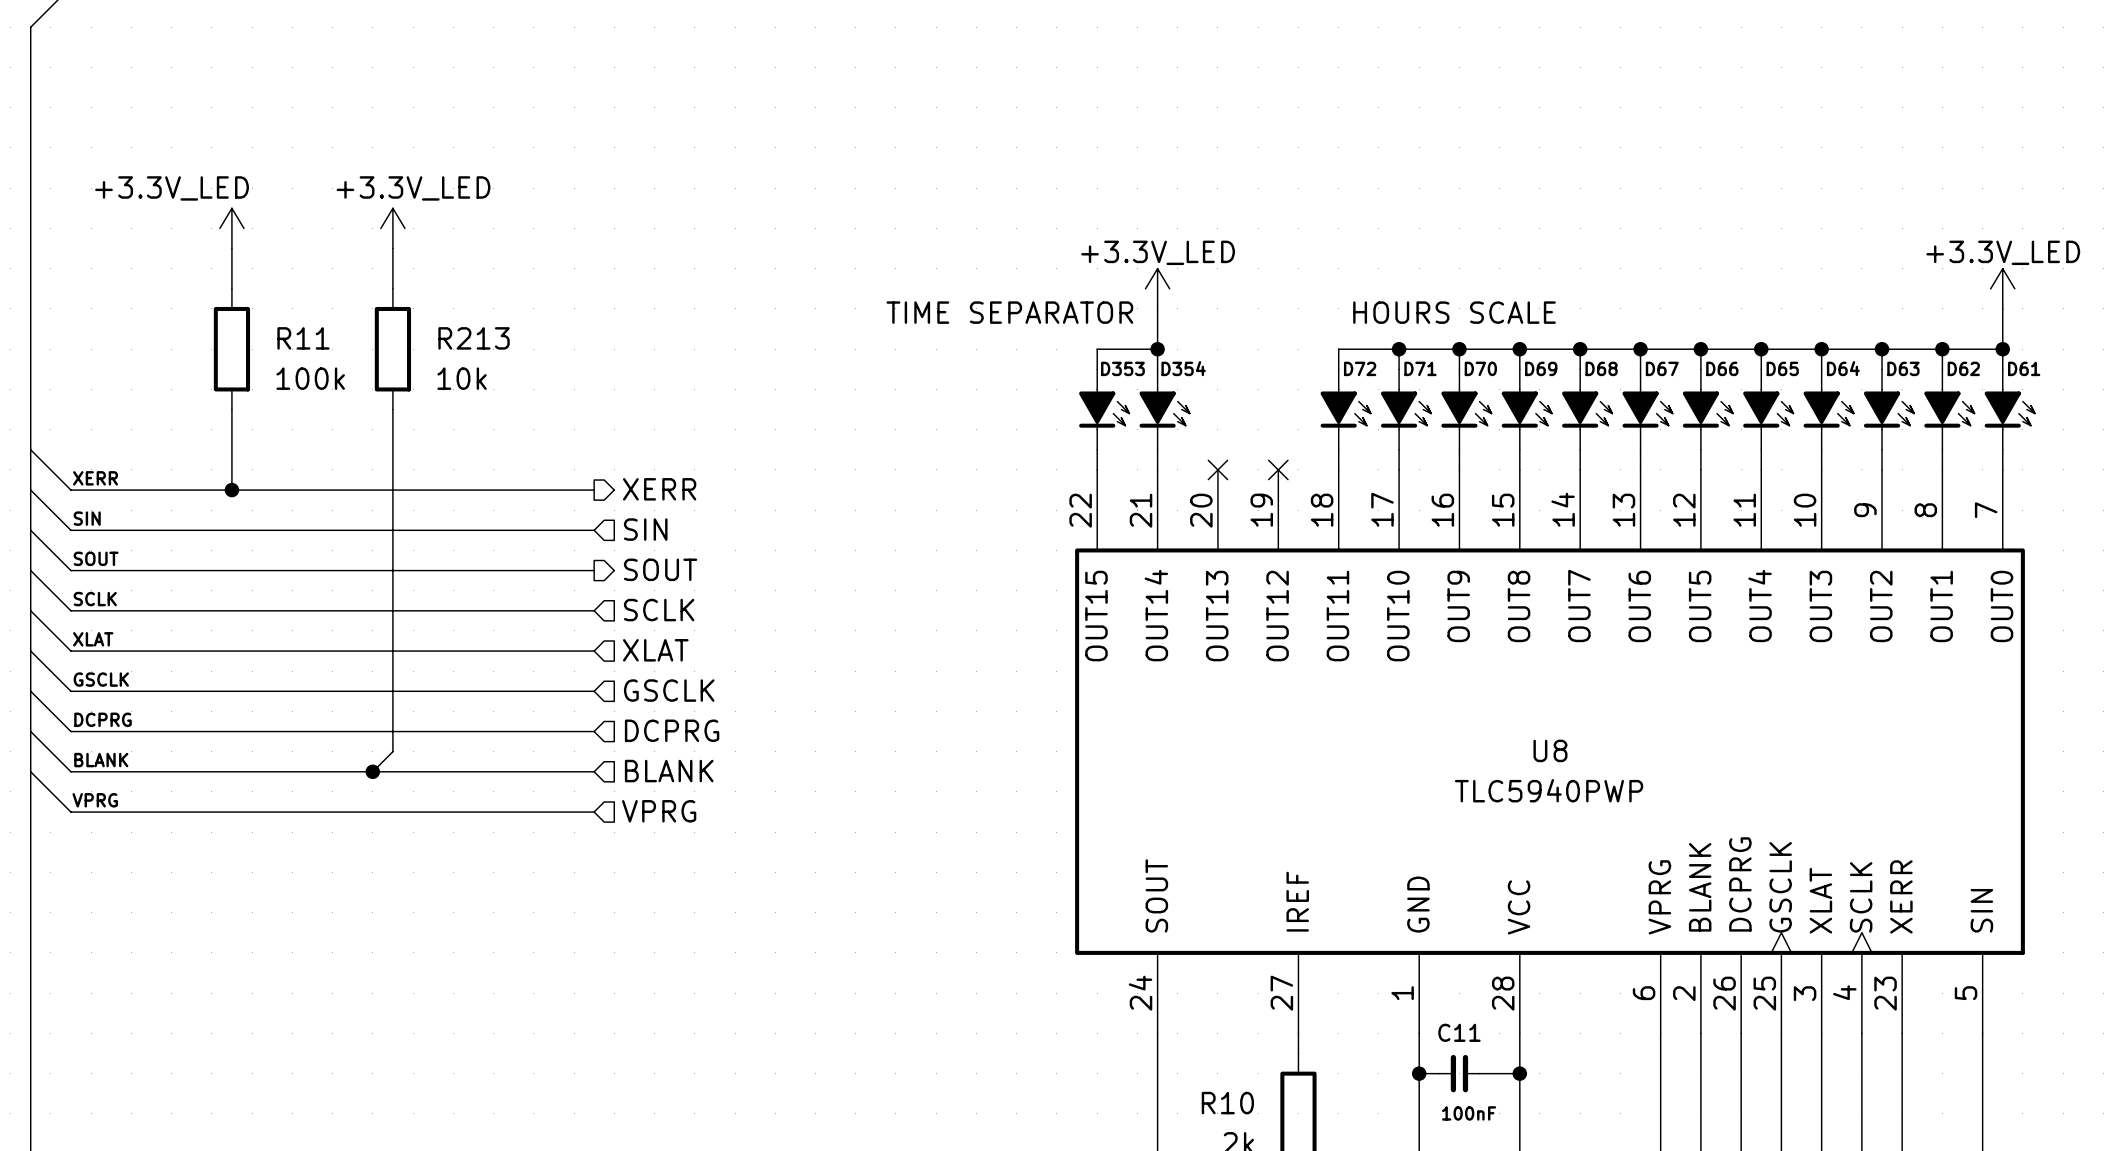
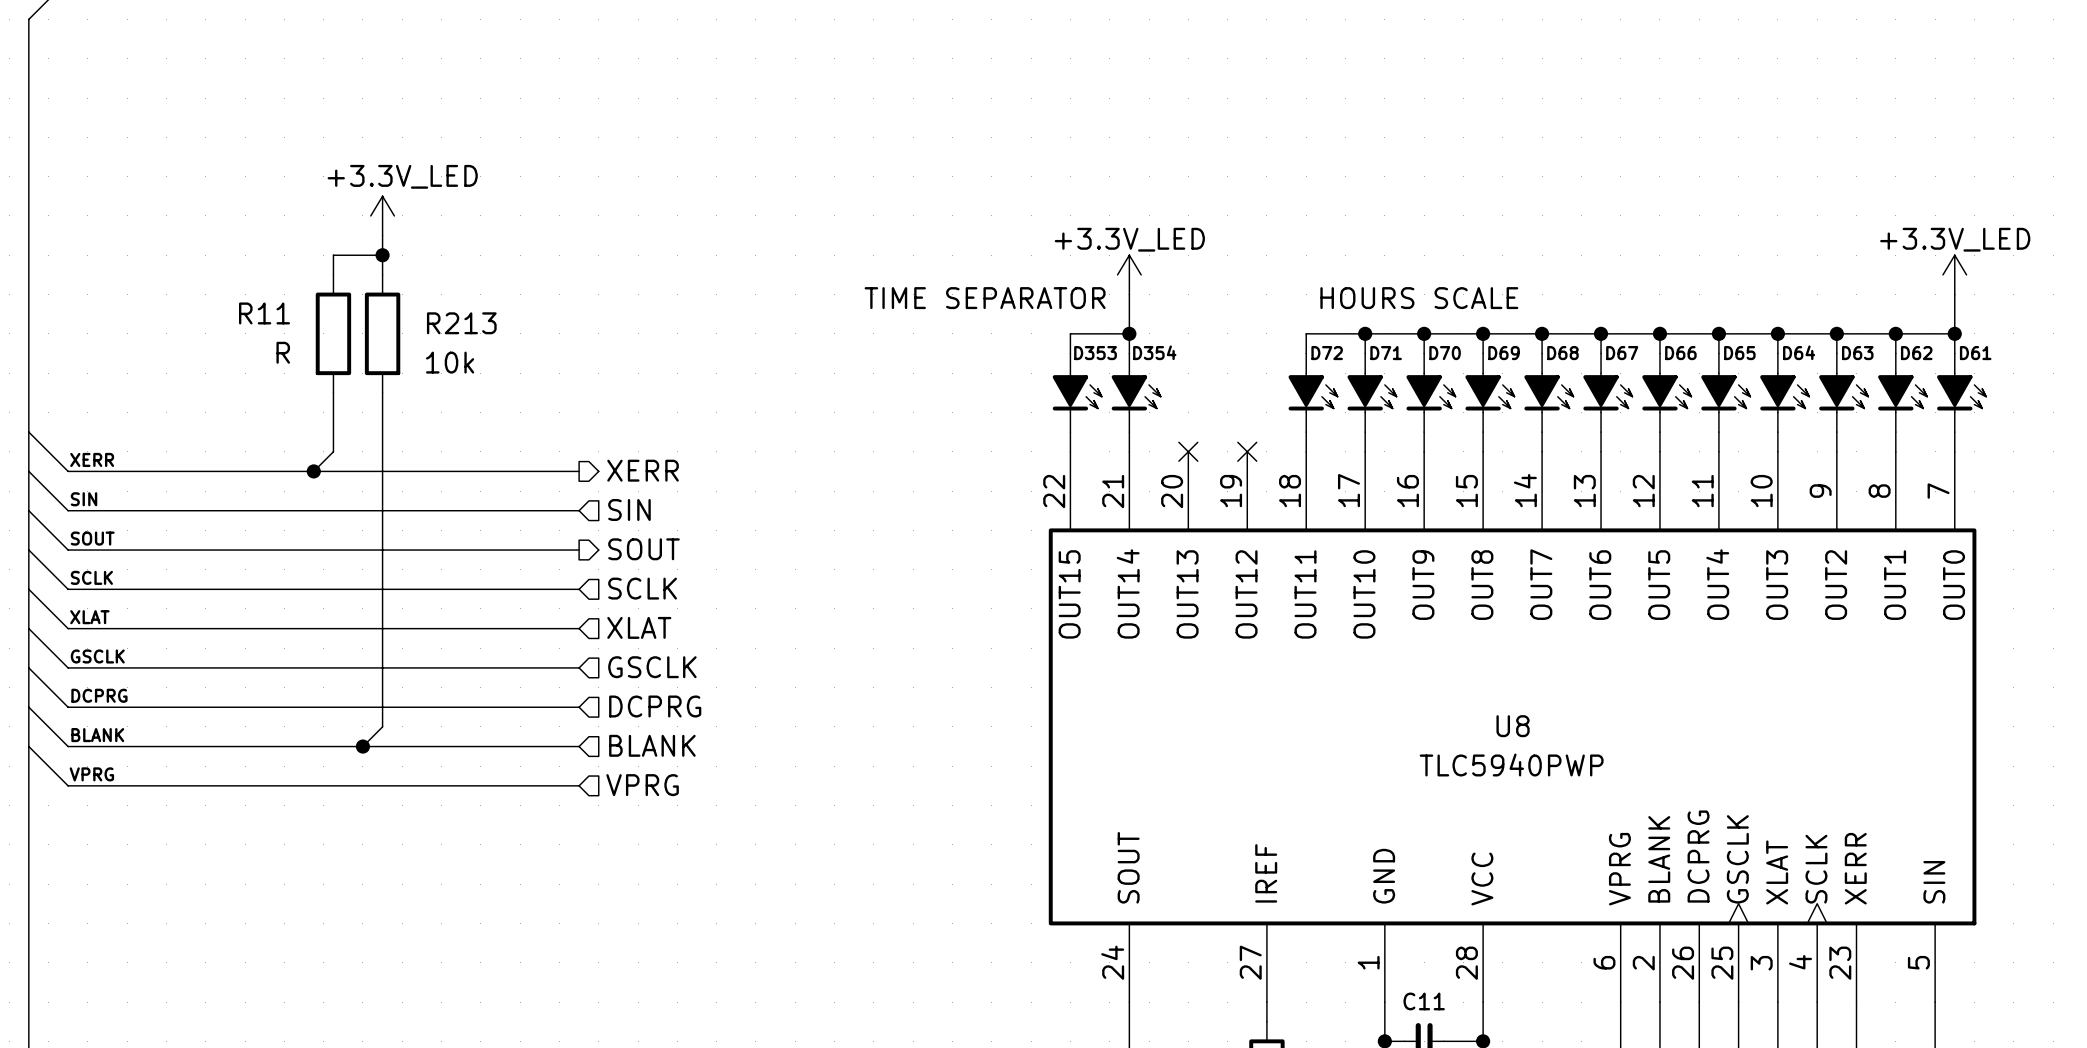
power symbol: +3.3V_LED (231, 228) -> none
wire: (231, 248) (231, 288) -> none
wire: none -> (382, 255) (333, 255) (333, 274)
junction: none -> (382, 255)
R11 name position: R11 (303, 338) -> R11 (264, 313)
R11 position: (231, 349) -> (333, 333)
R11 value: 100k (310, 378) -> R (283, 352)
wire: (231, 409) (231, 490) -> none
wire: none -> (333, 392) (333, 451) (313, 471)
junction position: (231, 490) -> (313, 471)

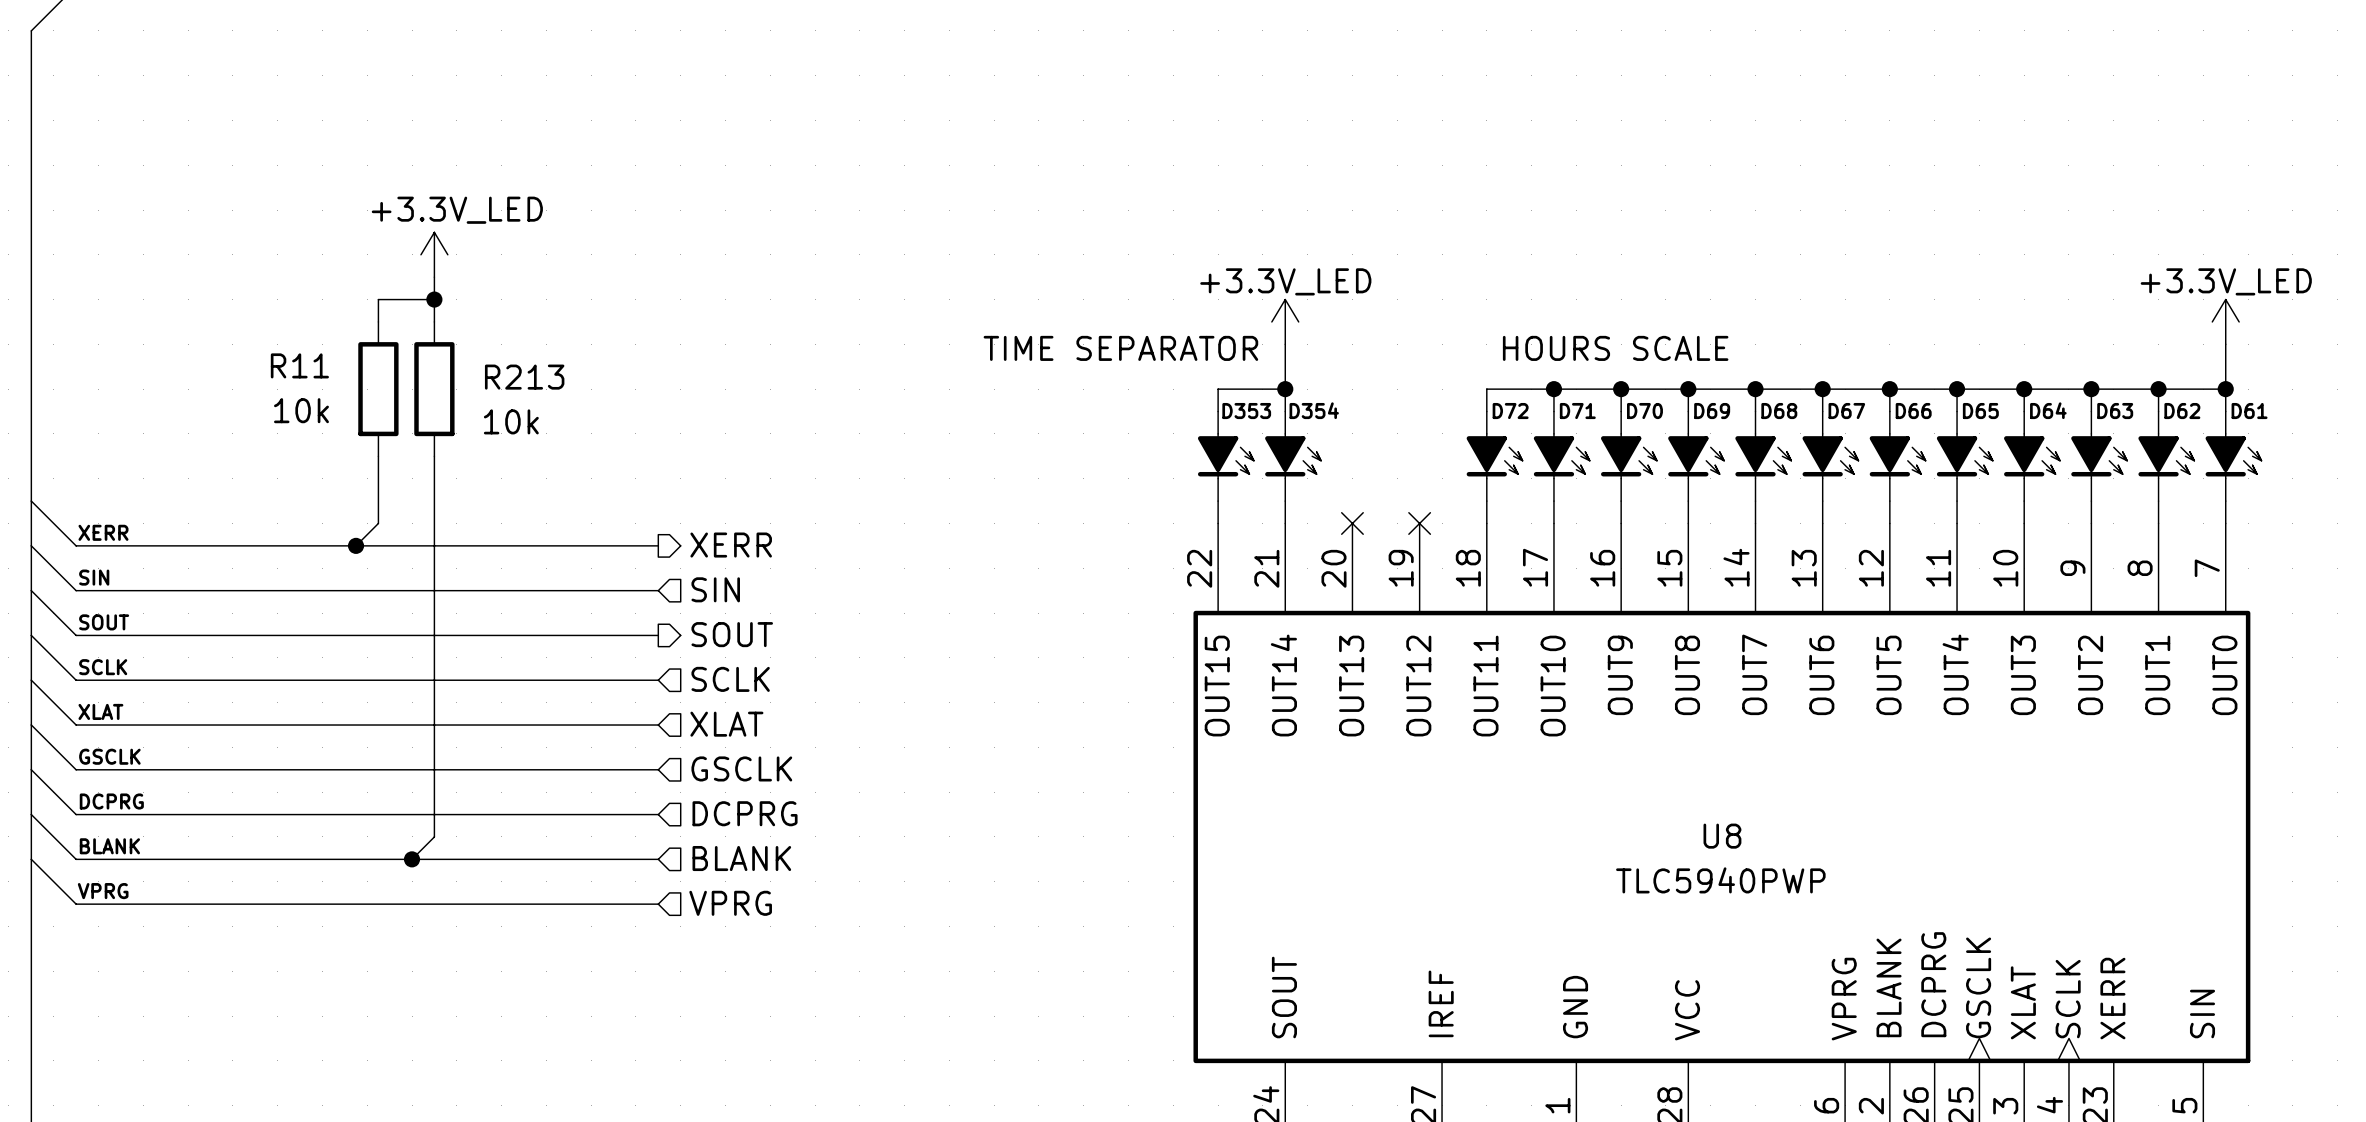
R11 value: R (283, 352) -> 10k (301, 410)

